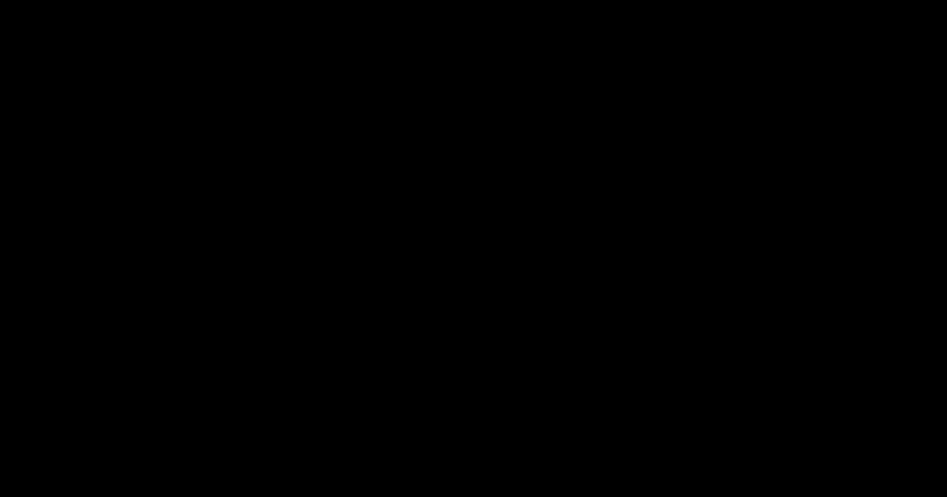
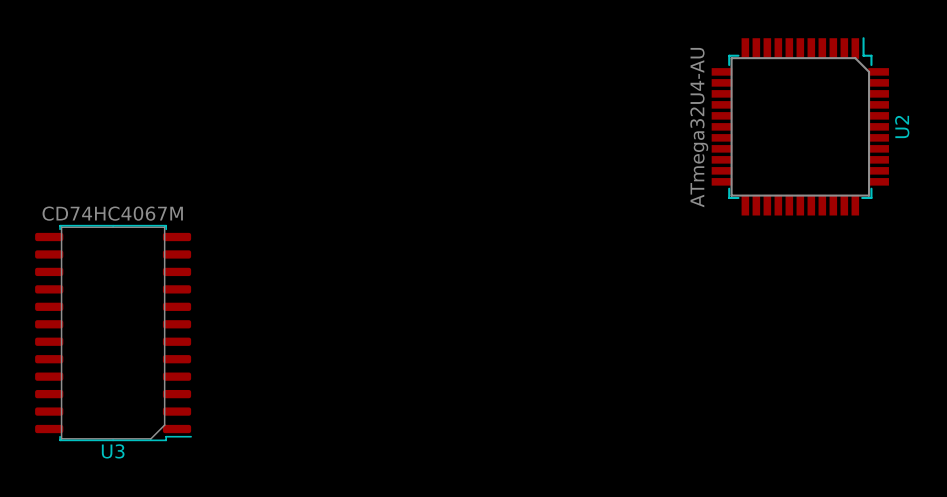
U2: none -> ATmega32U4-AU (800, 126)
U3: none -> CD74HC4067M (113, 333)

